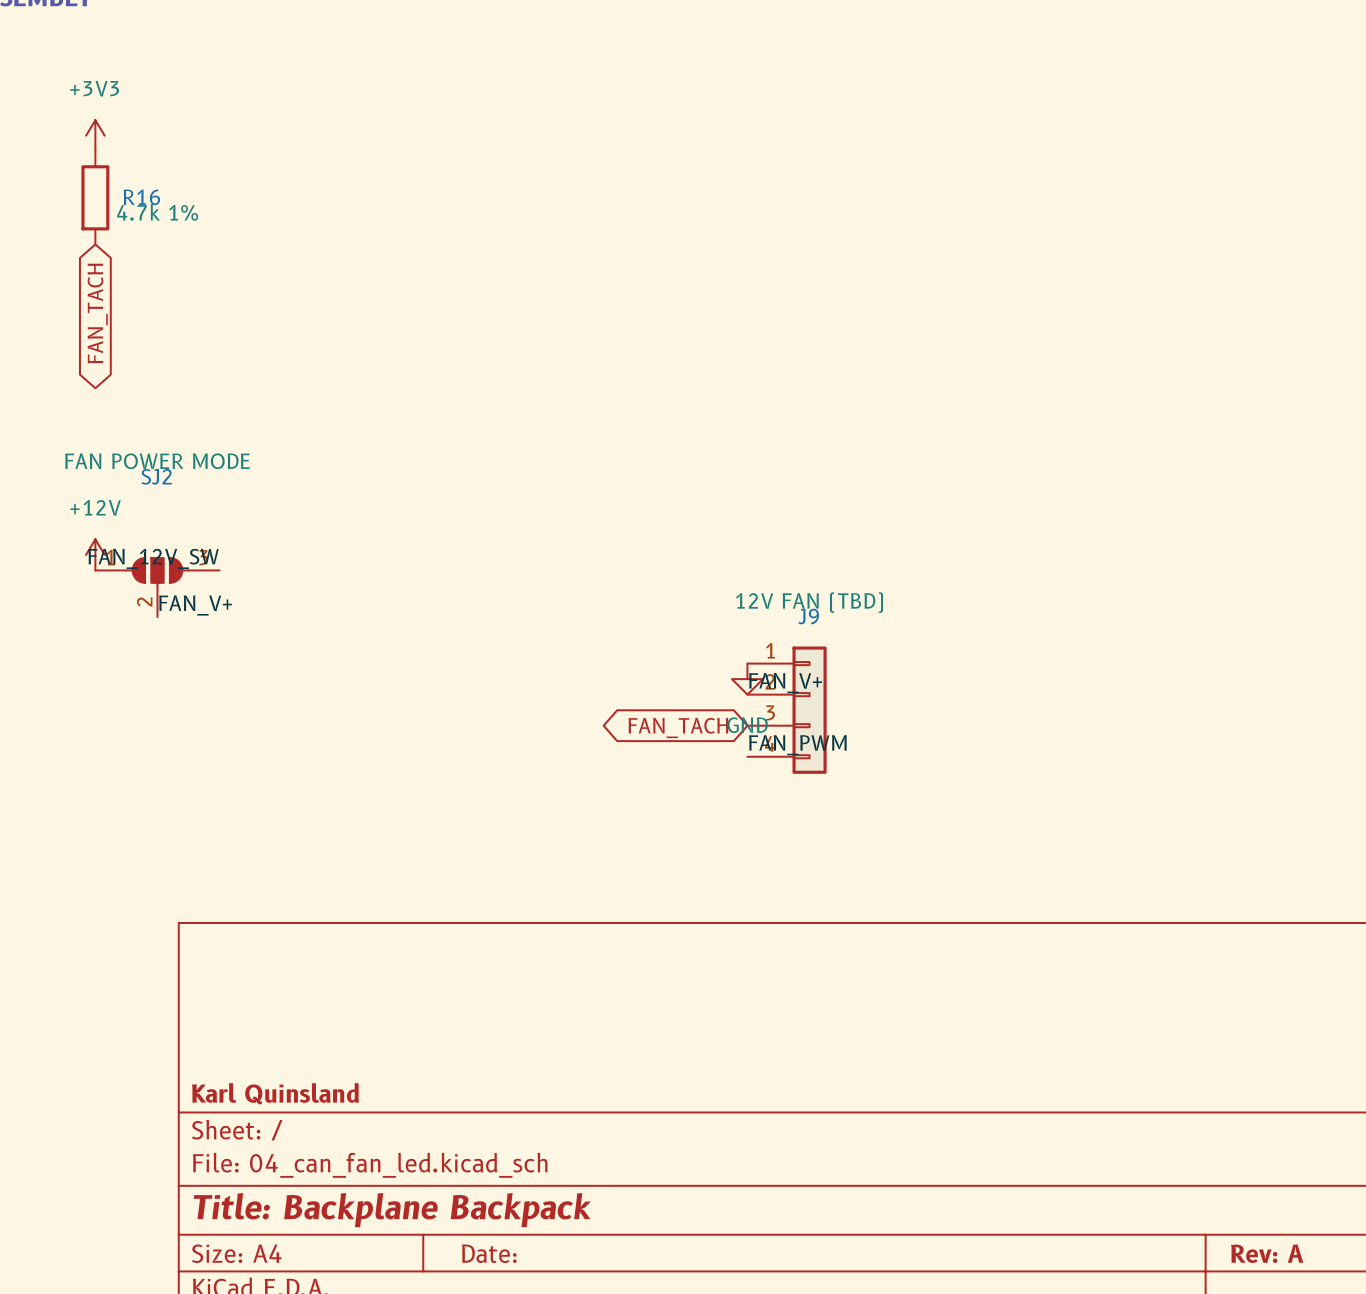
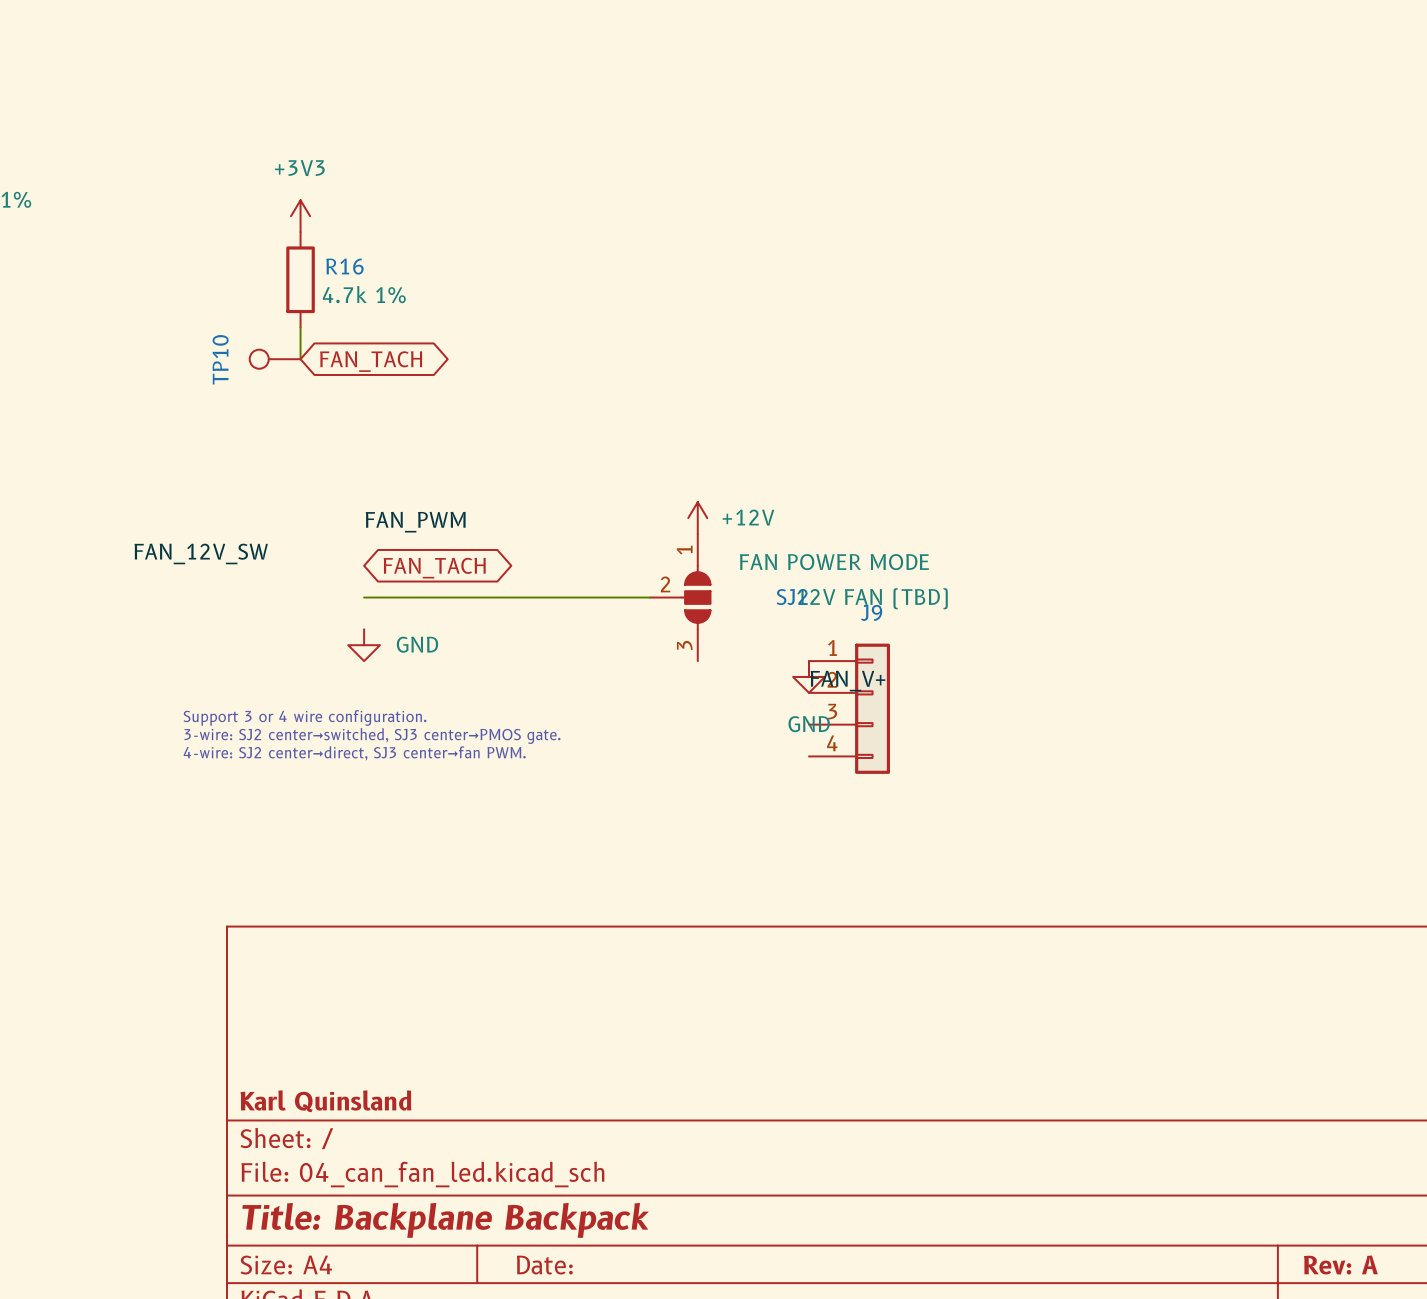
power symbol position: +3V3 (95, 135) -> +3V3 (300, 216)
R16 position: (95, 197) -> (300, 279)
R16 name position: R16 (141, 197) -> R16 (344, 266)
global label: FAN_TACH (97, 313) -> none
wire: none -> (300, 327) (300, 359)
TP10: none -> (275, 359)
global label: none -> FAN_TACH (371, 361)
SJ2 value position: FAN POWER MODE (157, 461) -> FAN POWER MODE (834, 562)
power symbol: none -> +12V (697, 518)
label: none -> FAN_PWM (415, 522)
power symbol: +12V (95, 554) -> none
SJ2 rotation: 0° (157, 571) -> 90° clockwise (696, 597)
global label: none -> FAN_TACH (434, 568)
SJ2 position: (157, 587) -> (680, 597)
wire: none -> (364, 597) (650, 597)
label: FAN_V+ (195, 605) -> none
power symbol: none -> GND (364, 645)
text: none -> Support 3 or 4 wire configuration. (305, 717)
global label: FAN_TACH (678, 728) -> none
text: none -> 3-wire: SJ2 center→switched, SJ3 center→PMOS gate. (372, 736)
label: FAN_PWM (797, 745) -> none
text: none -> 4-wire: SJ2 center→direct, SJ3 center→fan PWM. (354, 753)

